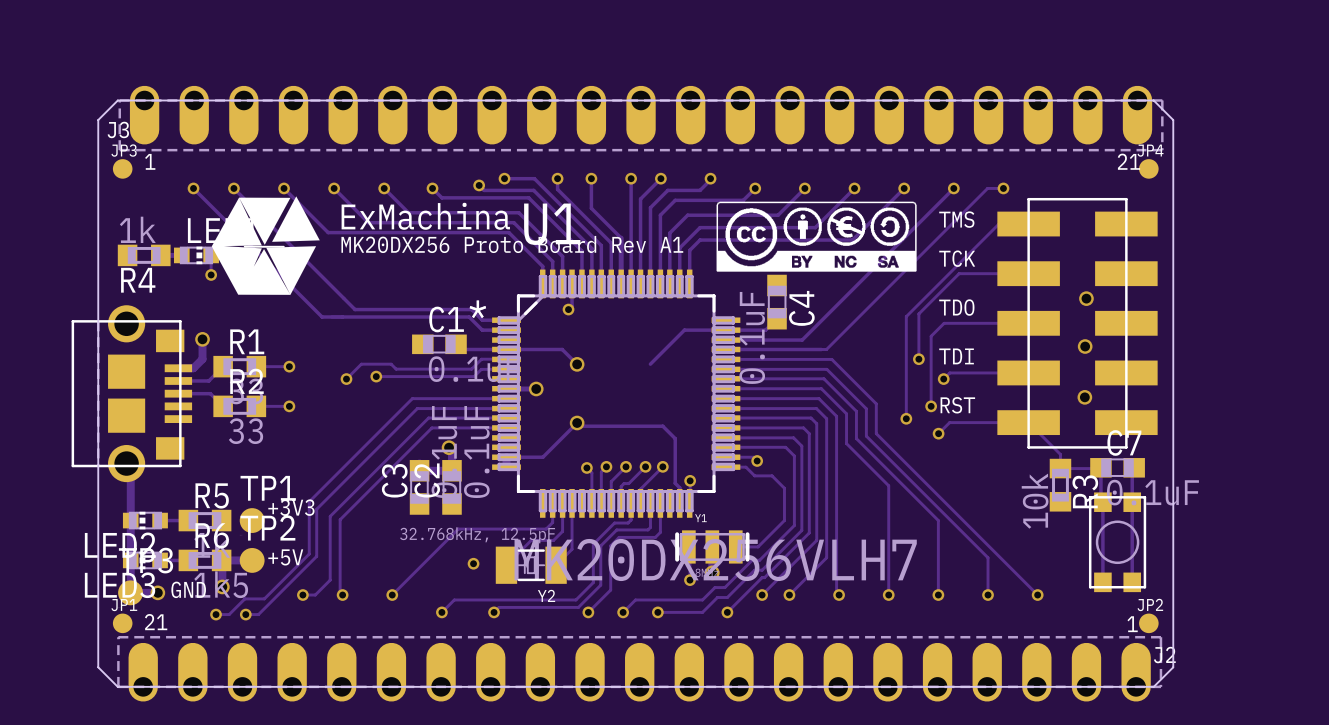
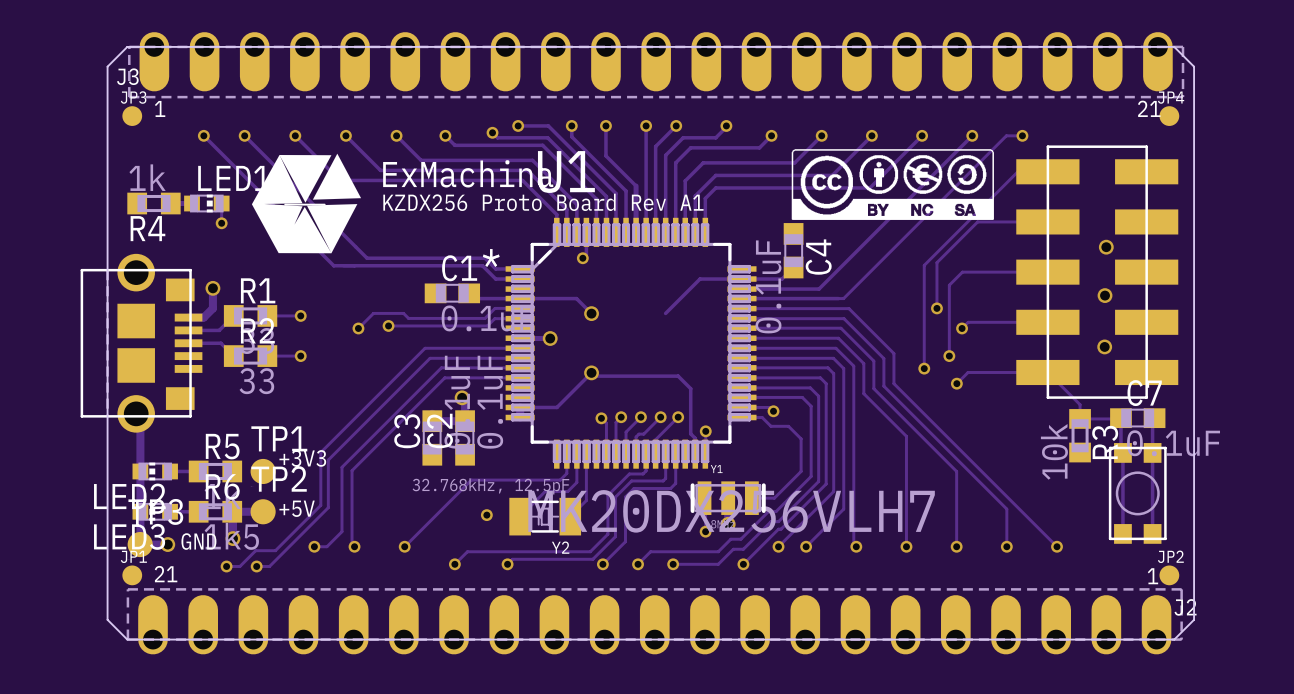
text: TMS (956, 219) -> none
drawing position: (816, 236) -> (892, 184)
text: MK20DX256 Proto Board Rev A1 (512, 244) -> KZDX256 Proto Board Rev A1 (543, 202)
drawing position: (265, 245) -> (306, 203)
text: TCK (957, 258) -> none
text: TDO (956, 307) -> none
text: TDI (956, 356) -> none
text: RST (957, 405) -> none

